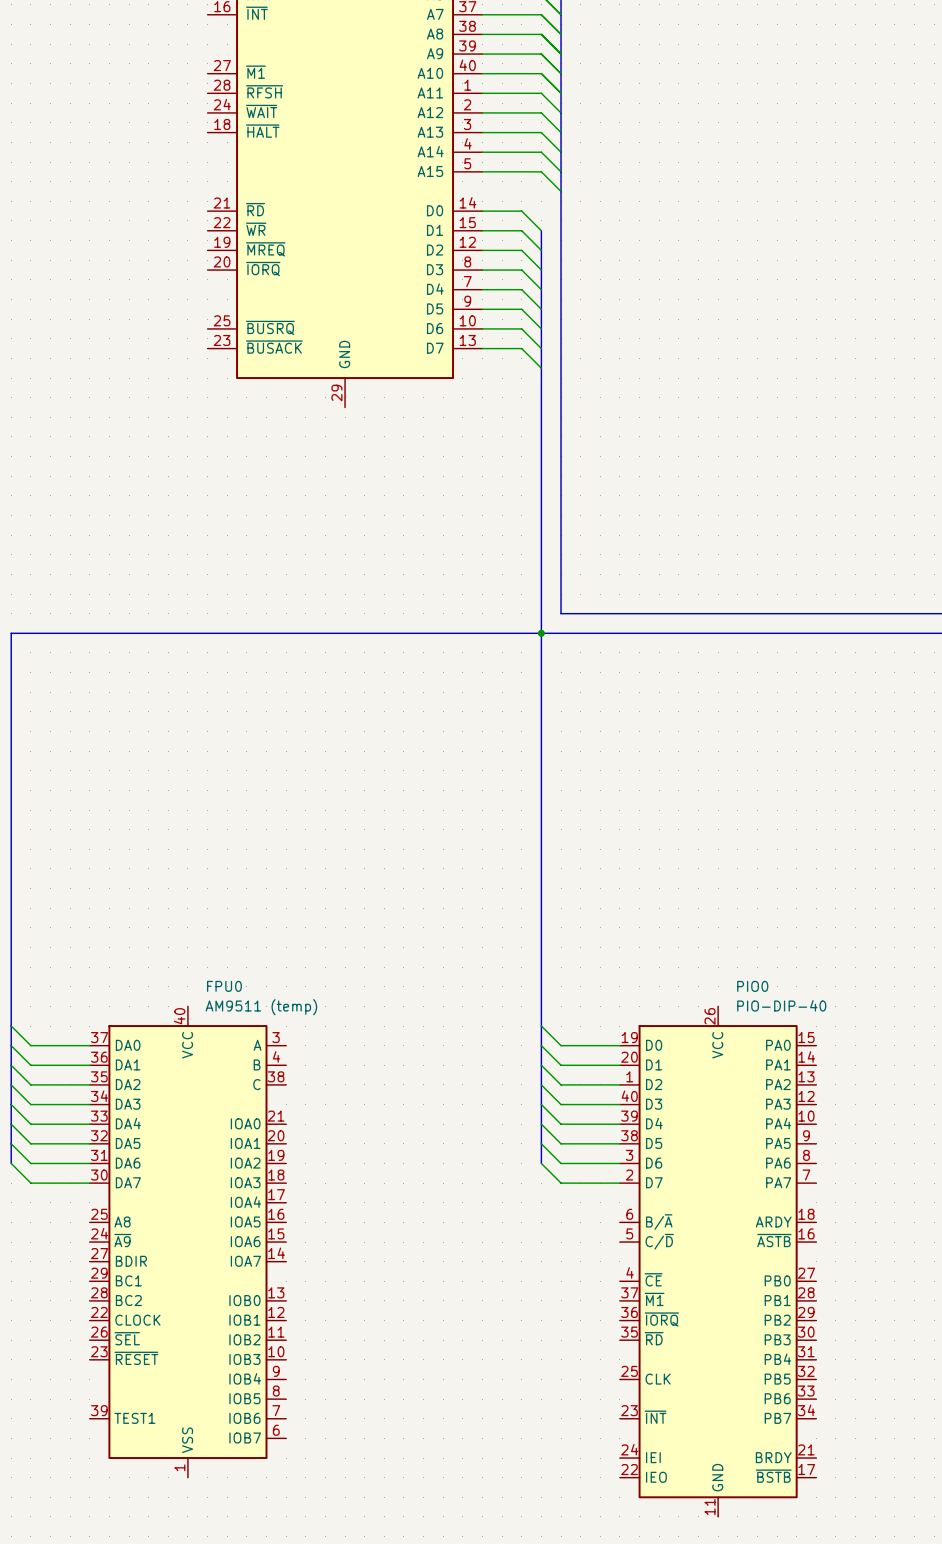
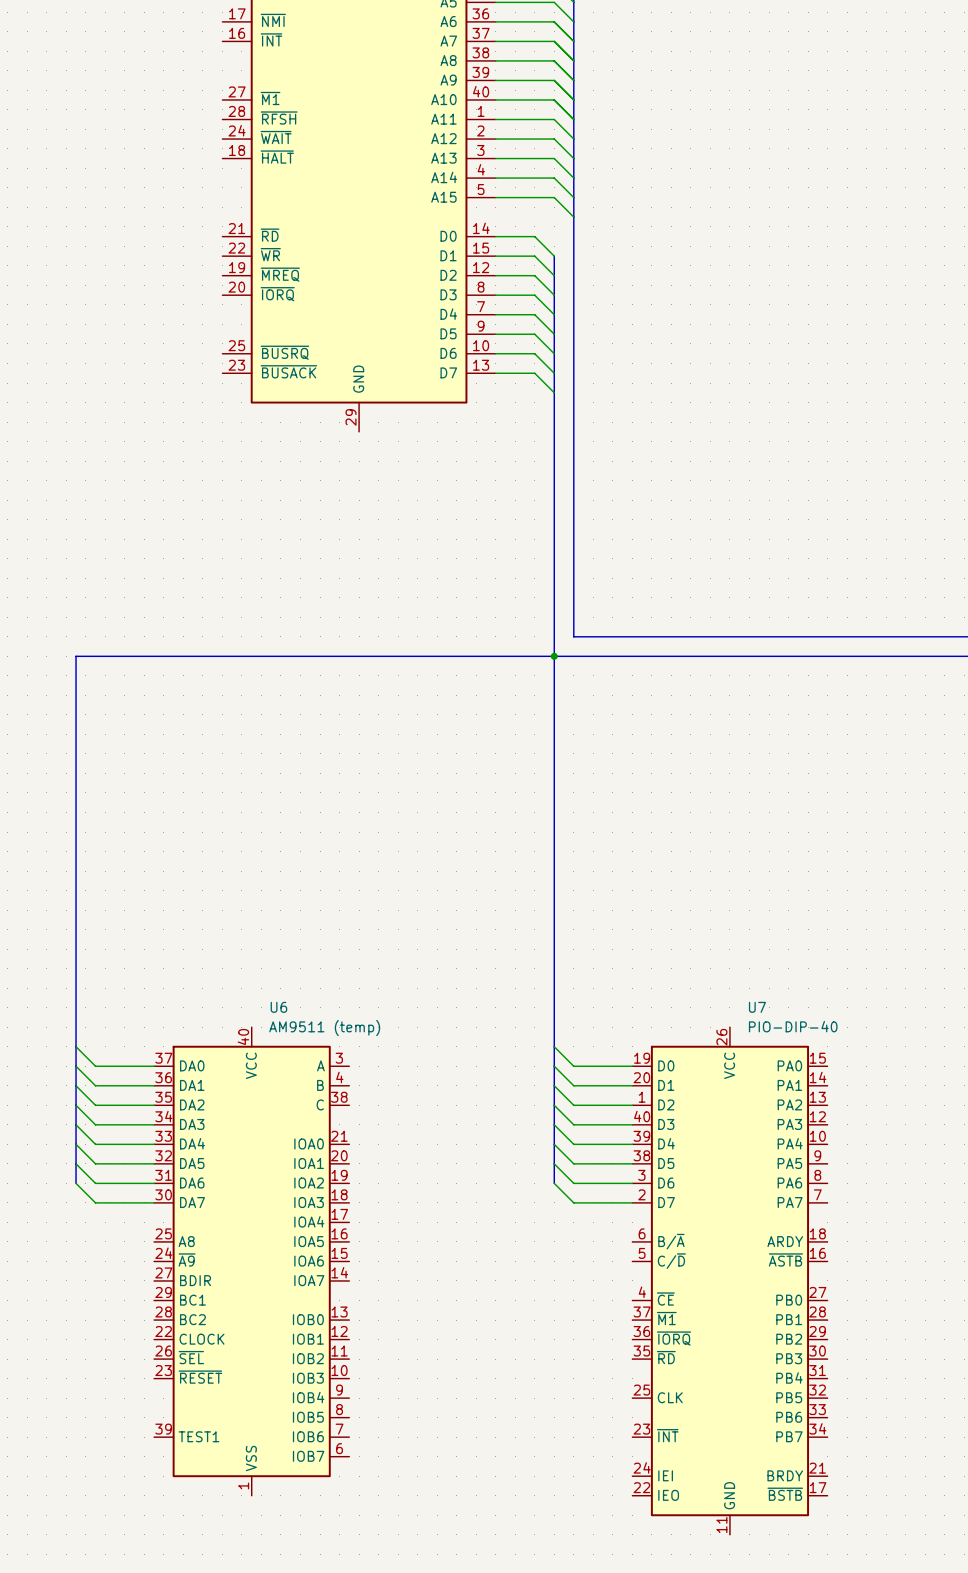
bus: (60, 633) (11, 633) (11, 1163) -> (76, 656) (76, 1183)
PIO0 name: PIO0 (752, 986) -> U7 (757, 1007)
wire: (11, 1026) (30, 1045) (79, 1045) -> (76, 1046) (95, 1066)
wire: (11, 1045) (30, 1065) (79, 1065) -> (76, 1066) (95, 1085)
wire: (11, 1065) (30, 1084) (79, 1084) -> (76, 1085) (95, 1105)
wire: (11, 1084) (30, 1104) (79, 1104) -> (76, 1105) (95, 1124)
wire: (11, 1104) (30, 1124) (79, 1124) -> (76, 1124) (95, 1144)
wire: (11, 1124) (30, 1143) (79, 1143) -> (76, 1144) (95, 1163)
wire: (11, 1143) (30, 1163) (79, 1163) -> (76, 1163) (95, 1183)
wire: (11, 1163) (30, 1183) (79, 1183) -> (76, 1183) (95, 1202)
FPU0: AM9511 (temp) (187, 1242) -> none
U6: none -> AM9511 (temp) (251, 1261)

